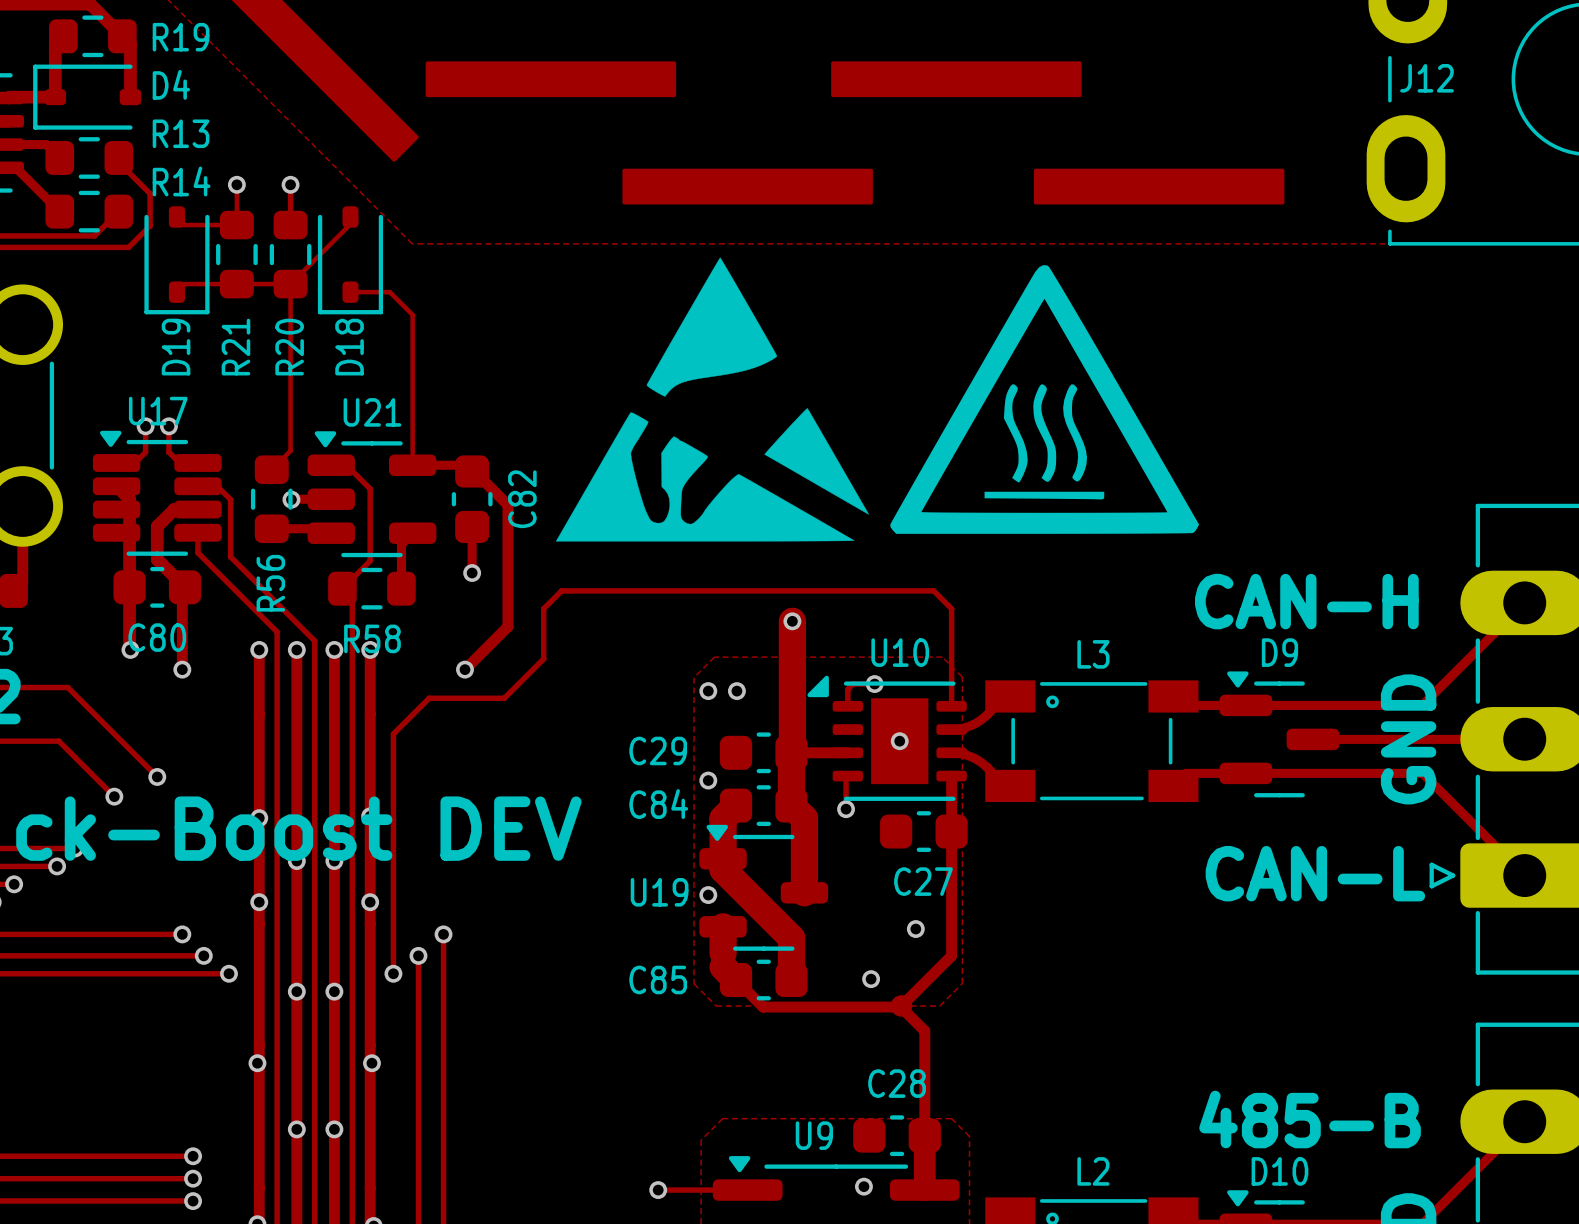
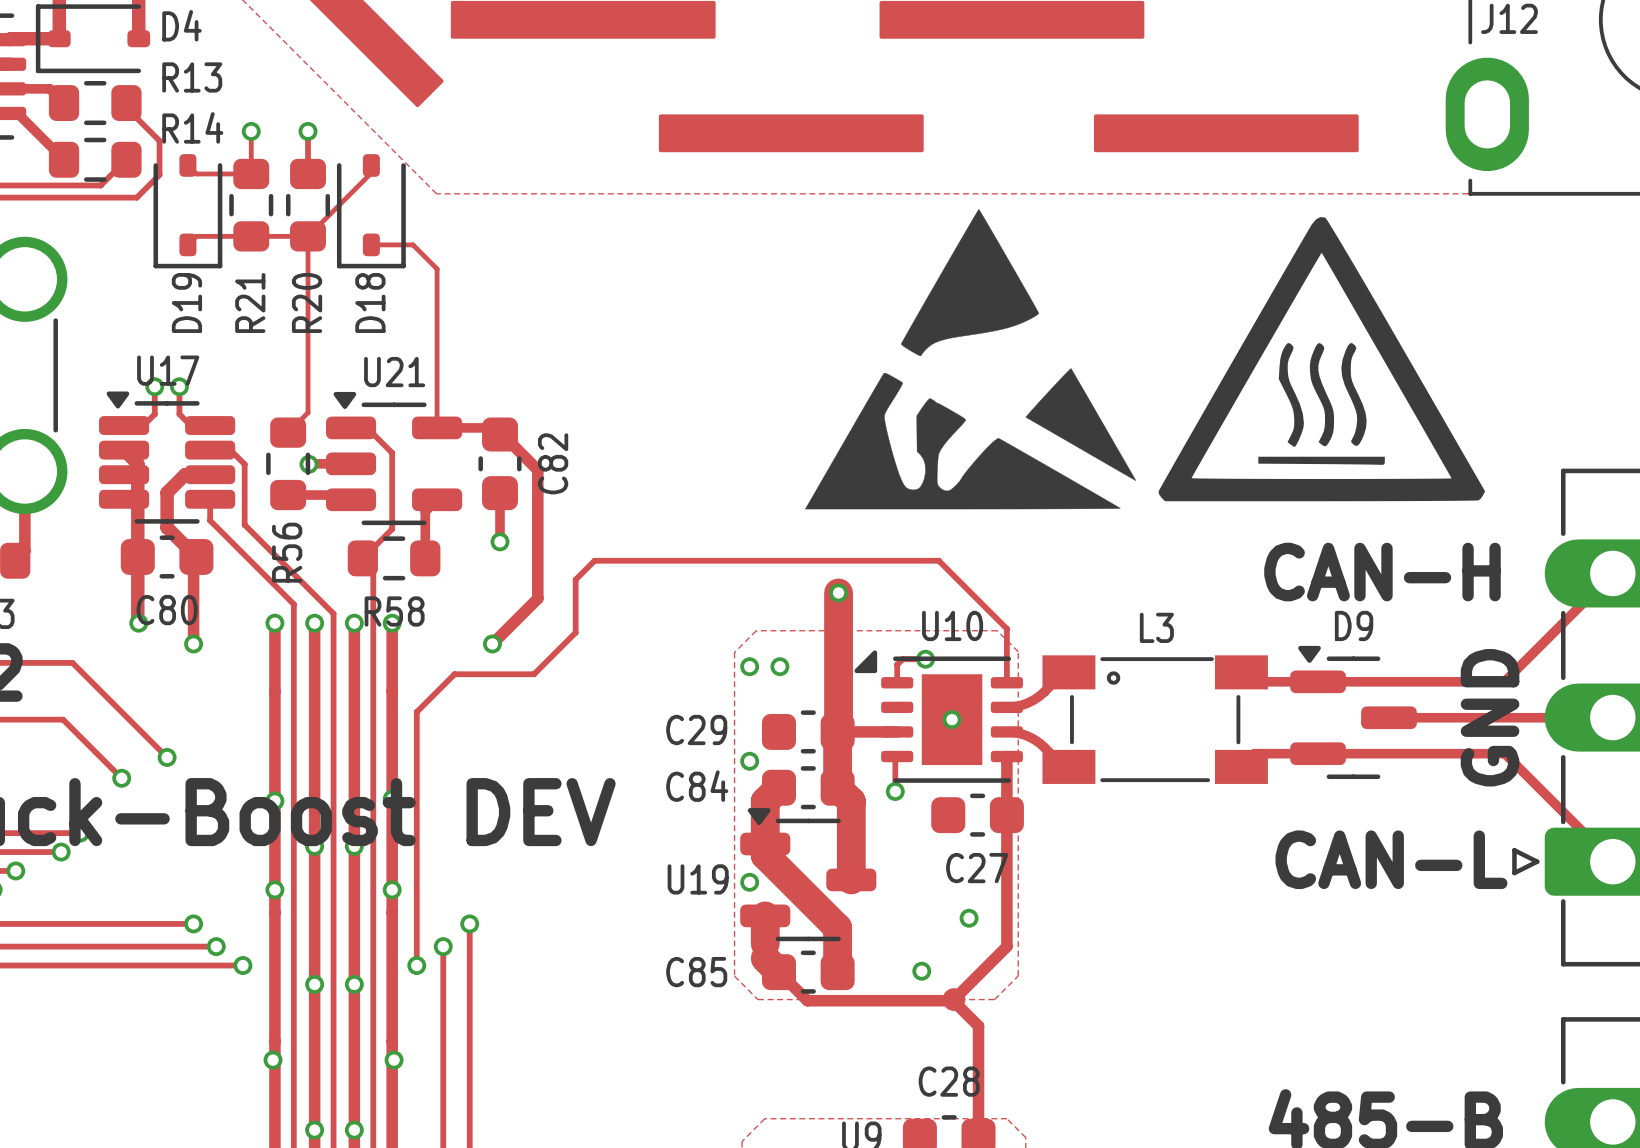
drawing position: (712, 399) -> (970, 359)
drawing position: (1044, 399) -> (1321, 359)
track: (887, 590) (933, 590) (951, 608) (951, 655) -> (938, 560) (1006, 628)

